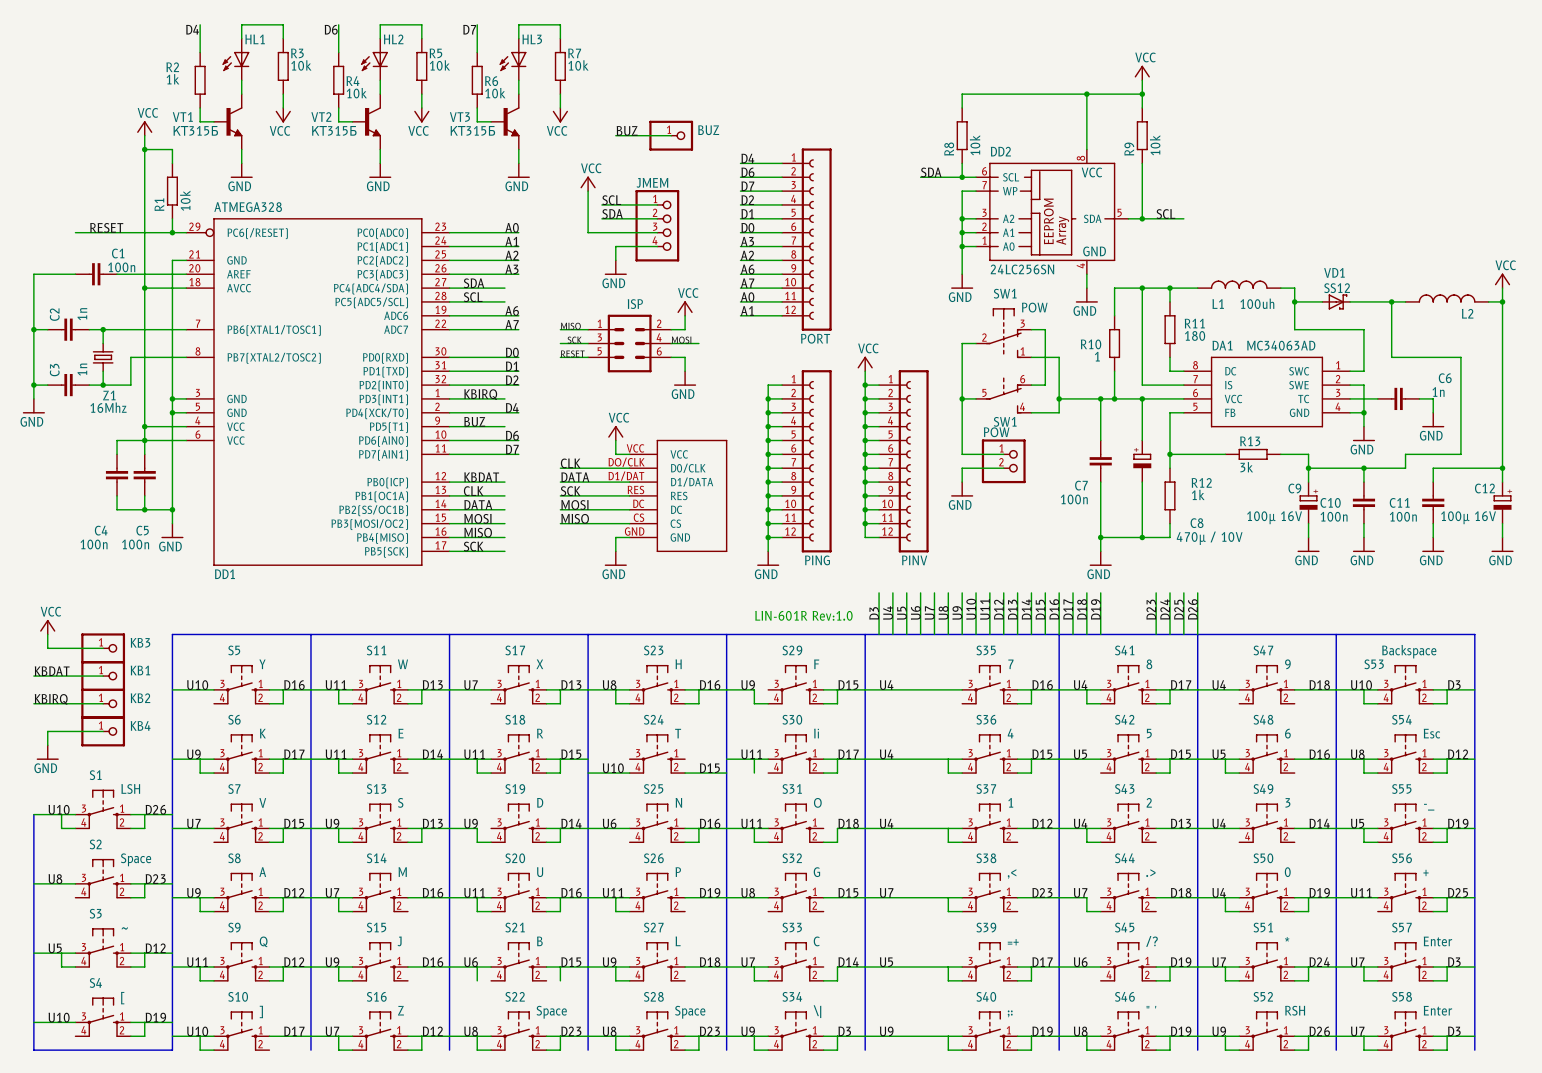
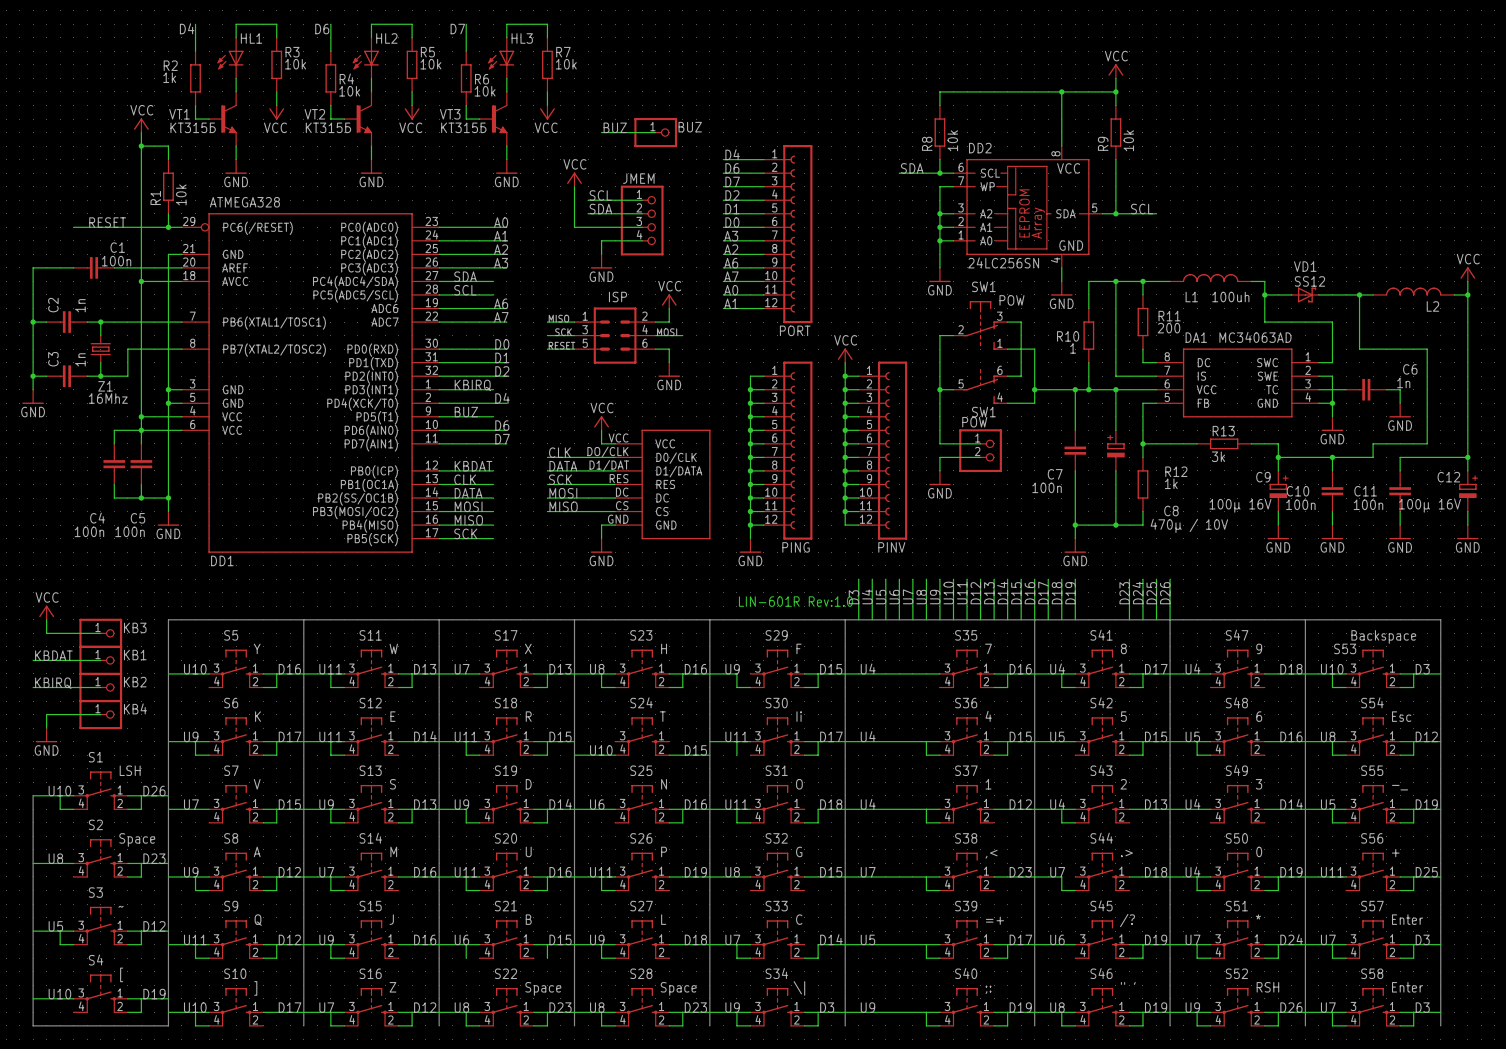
R11 value: 180 (1195, 335) -> 200 (1168, 328)

